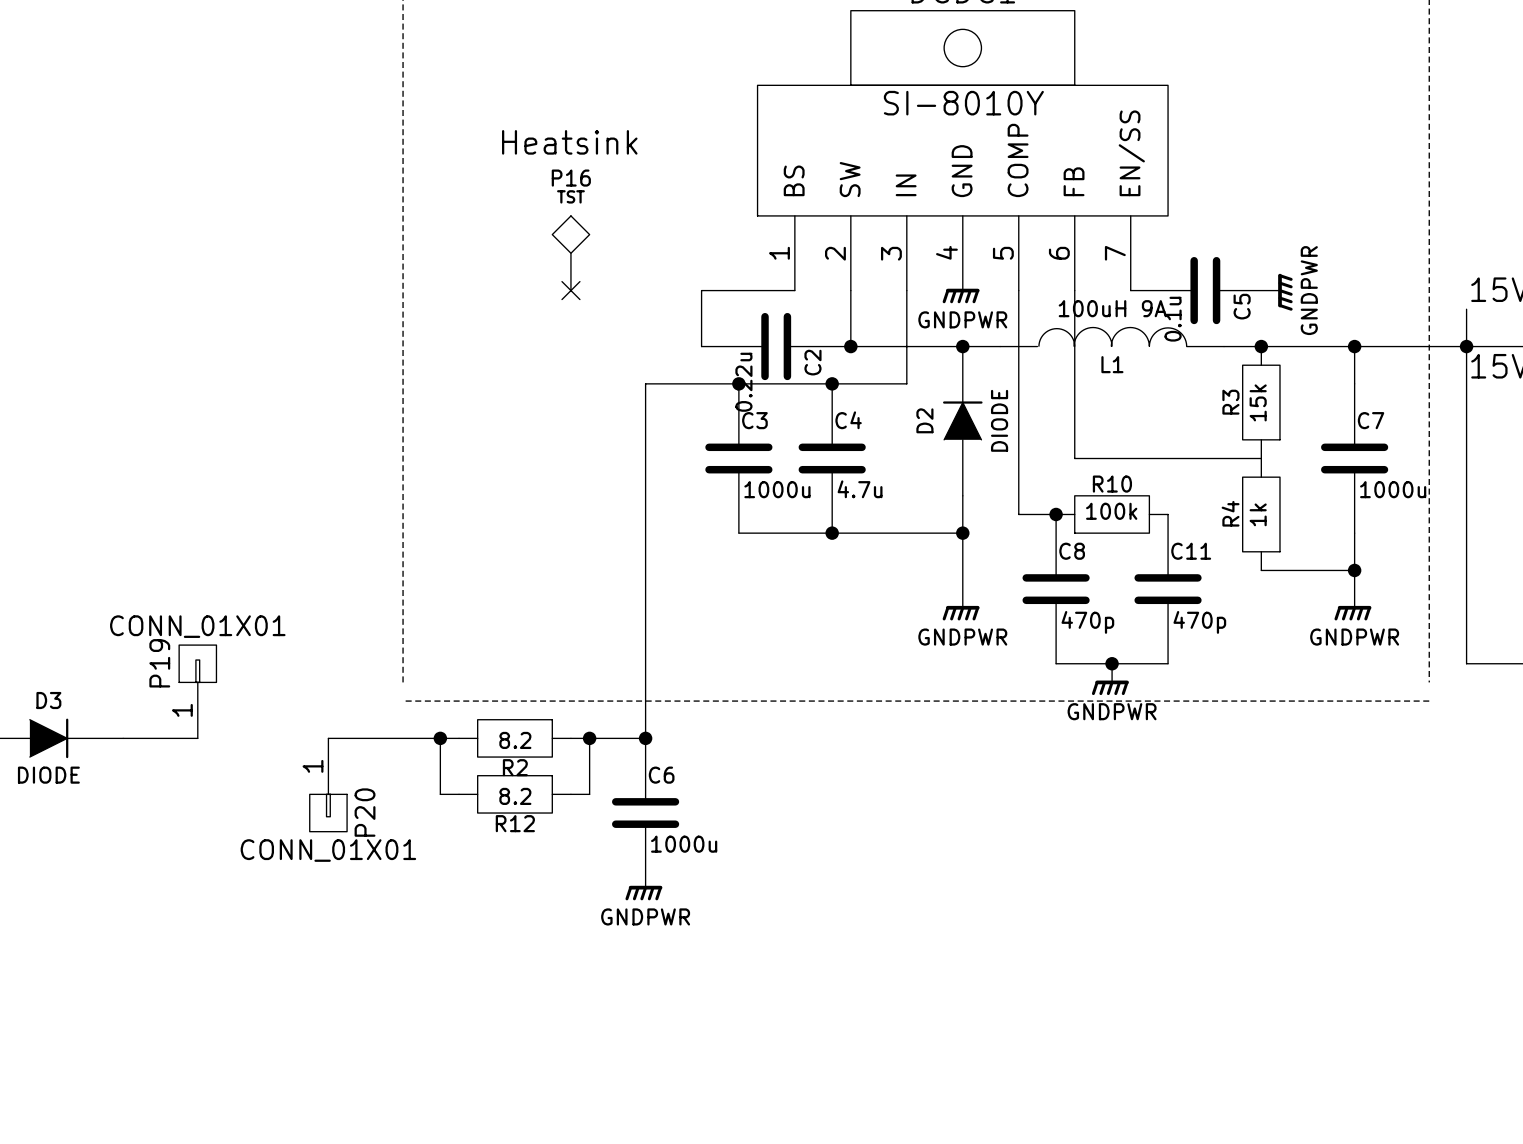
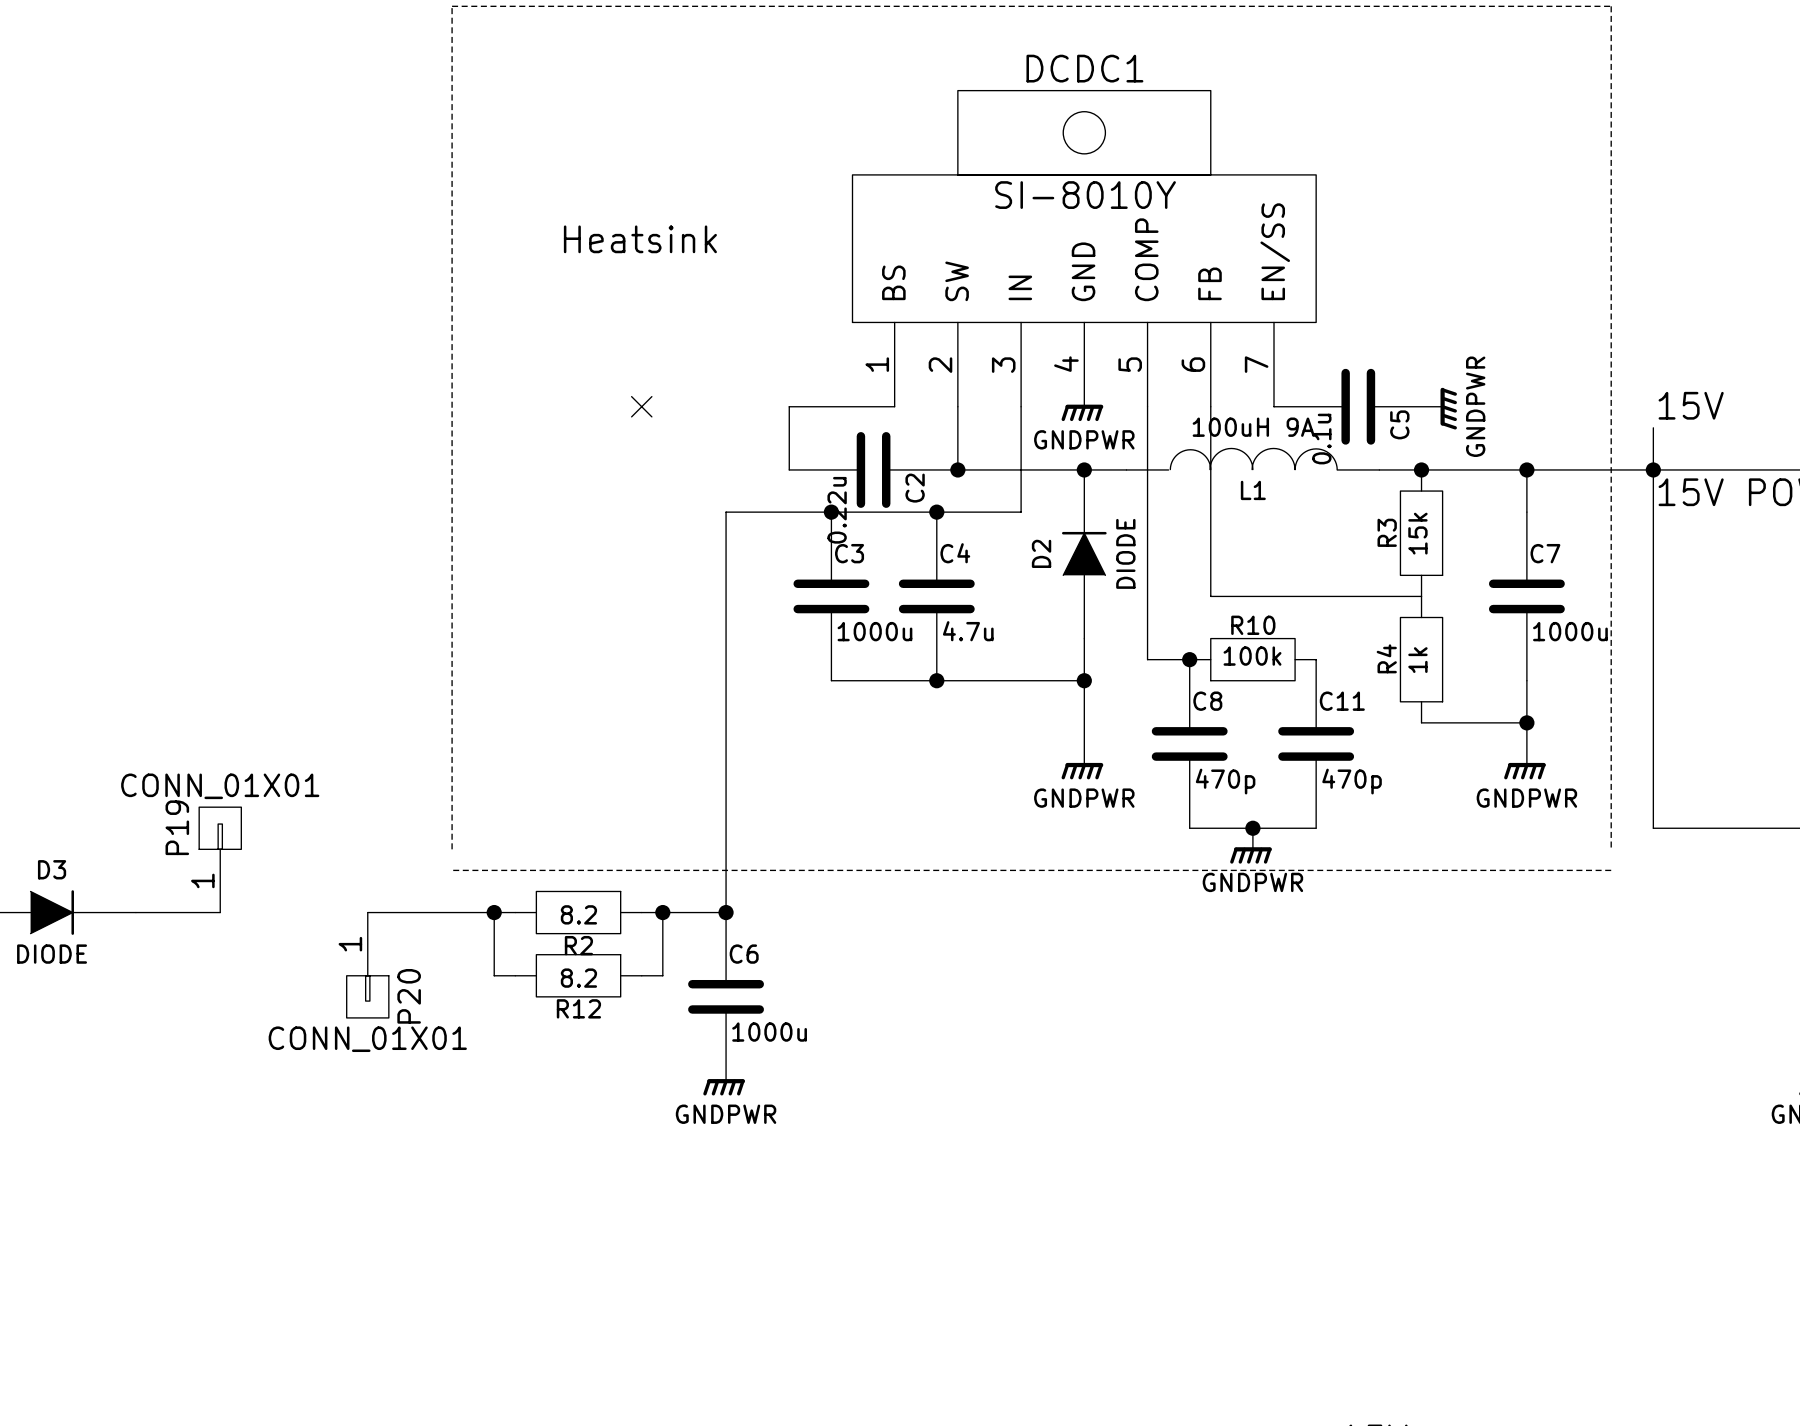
P16: TST (570, 253) -> none

